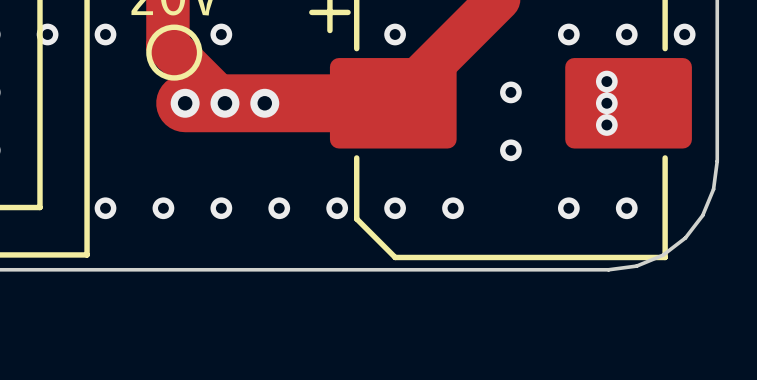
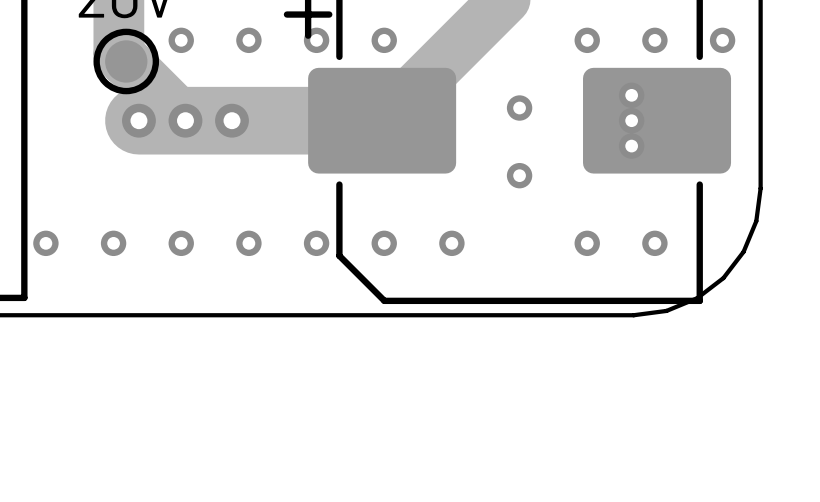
via: (105, 34) -> none
via: none -> (248, 40)
via: none -> (316, 40)

